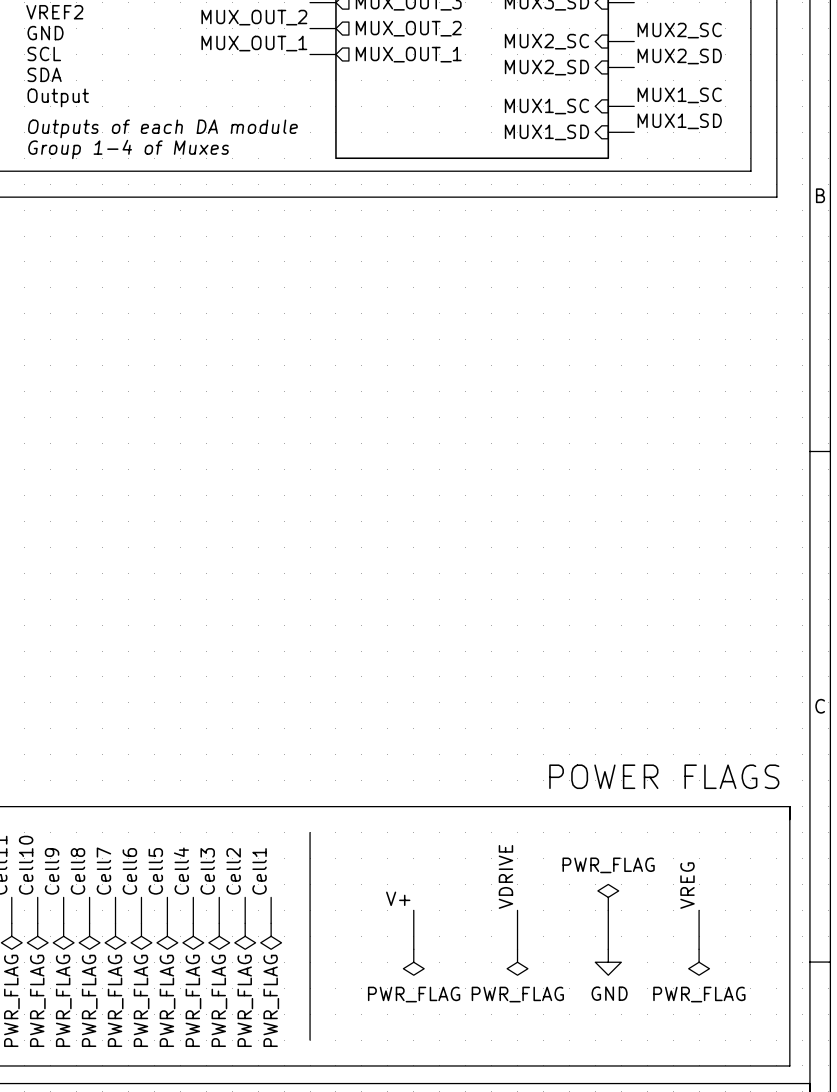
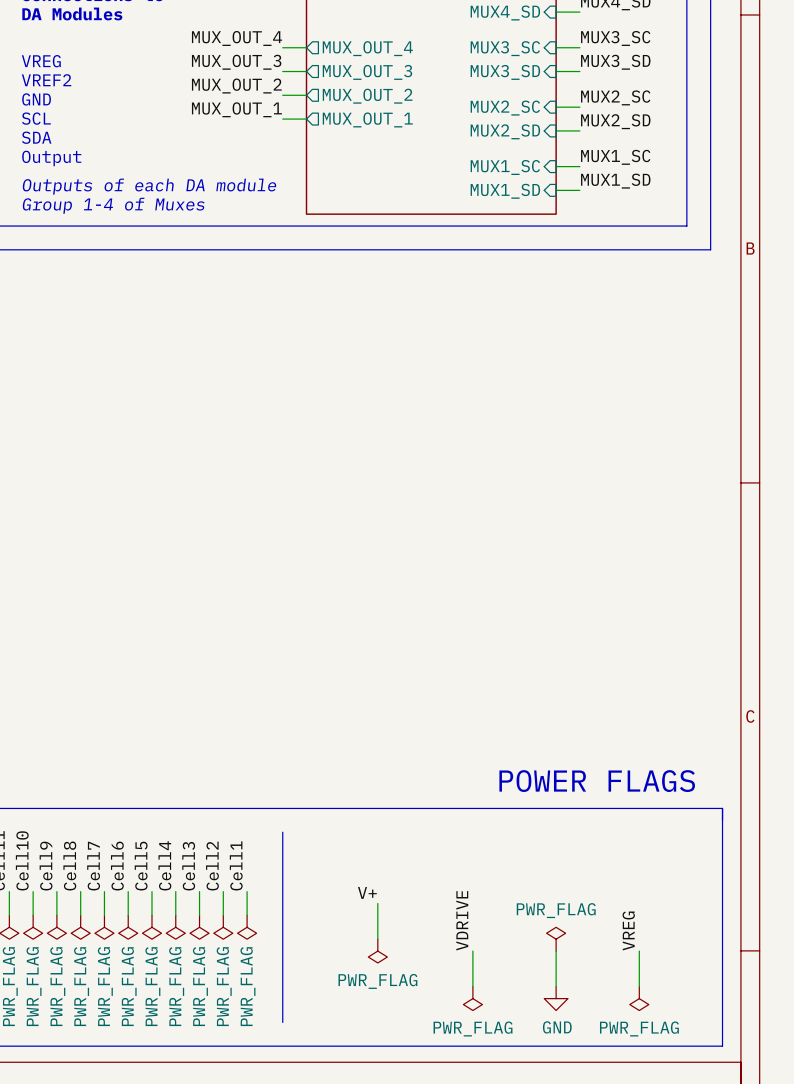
label position: VDRIVE (505, 876) -> VDRIVE (462, 920)
label position: VREG (687, 885) -> VREG (628, 931)
power symbol: PWR_FLAG (608, 897) -> none
wire: (517, 910) (517, 949) -> (472, 951) (472, 986)
wire: (608, 910) (608, 949) -> (556, 951) (556, 986)
wire: (699, 910) (699, 949) -> (639, 951) (639, 986)
power symbol: none -> PWR_FLAG (556, 939)
power symbol: PWR_FLAG (517, 962) -> none
power symbol position: GND (608, 962) -> GND (556, 998)
power symbol: PWR_FLAG (699, 962) -> none
power symbol: none -> PWR_FLAG (472, 998)
power symbol: none -> PWR_FLAG (639, 998)

